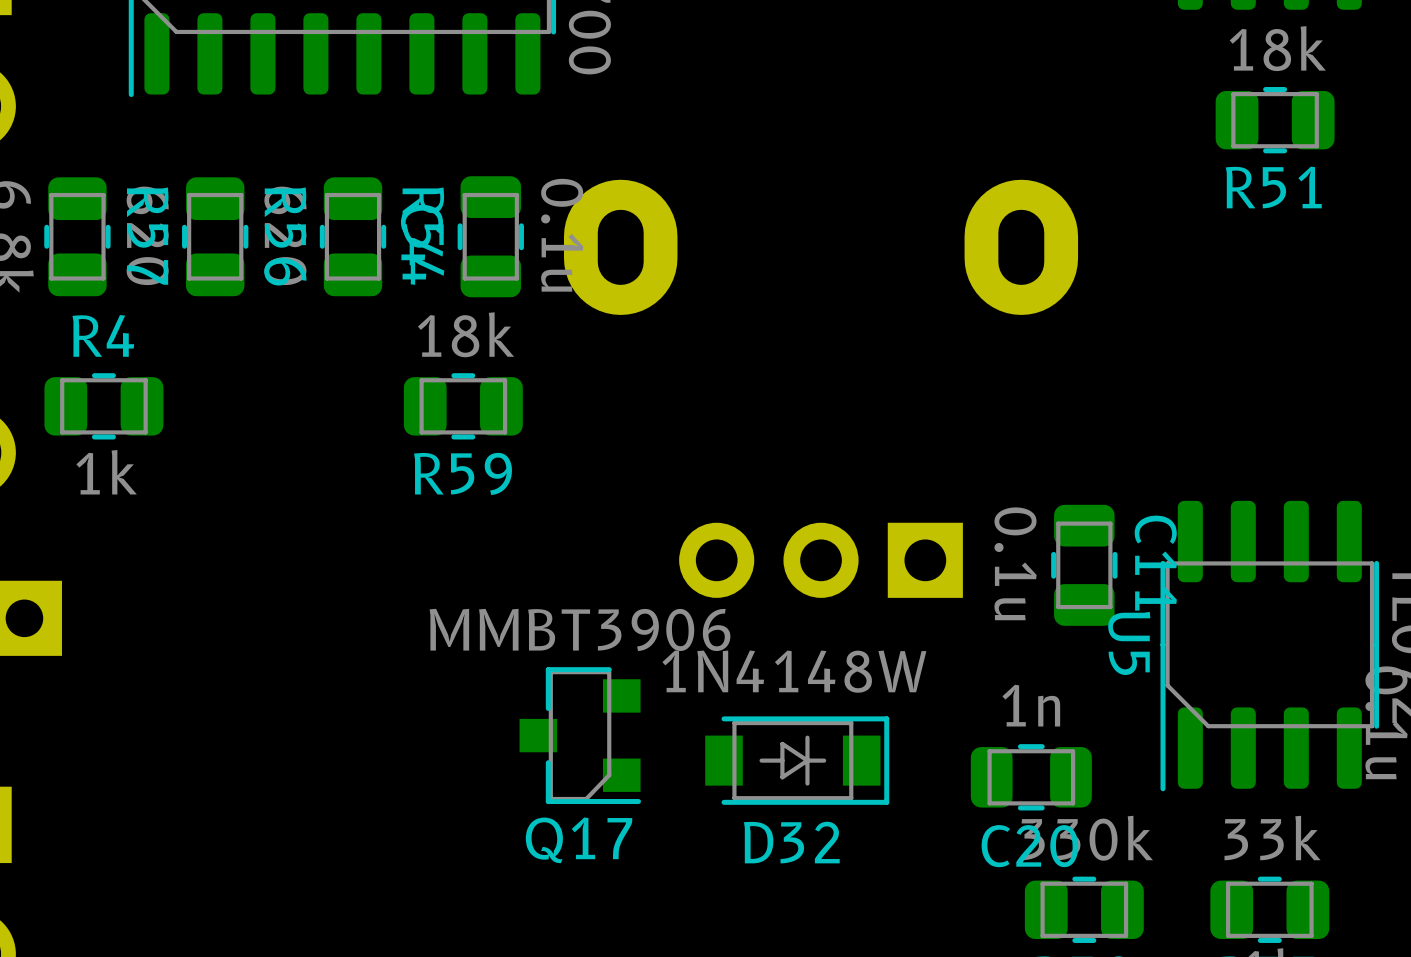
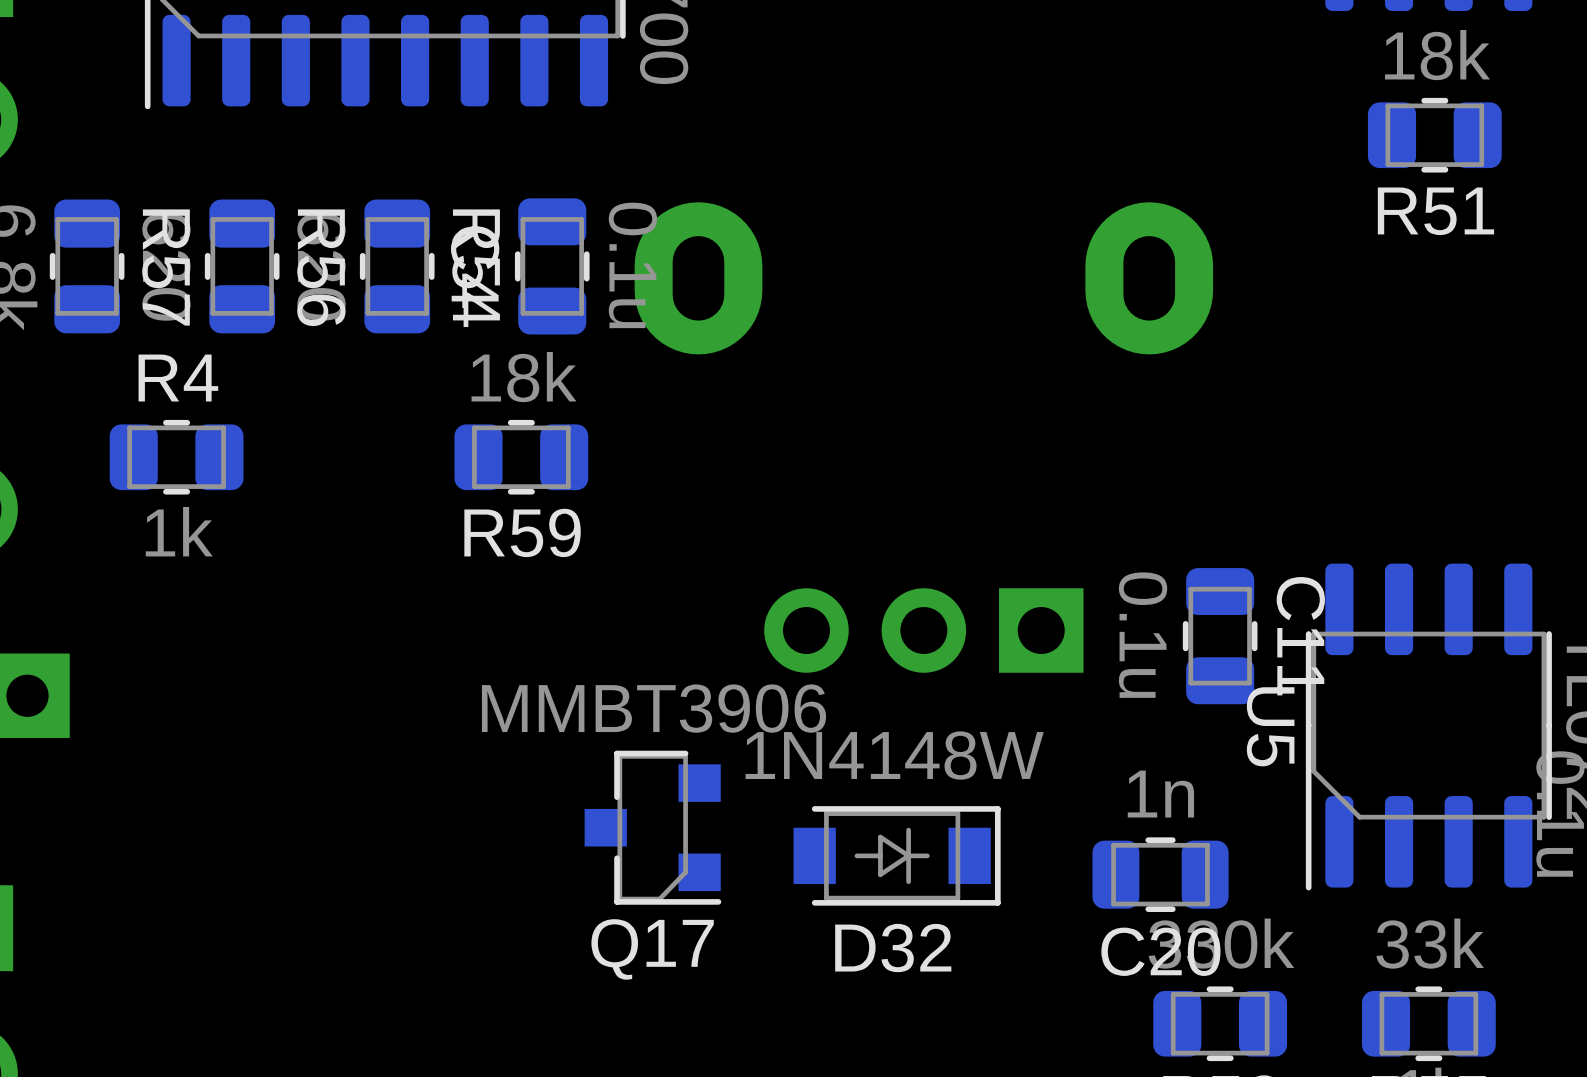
R4 position: (103, 406) -> (176, 457)

